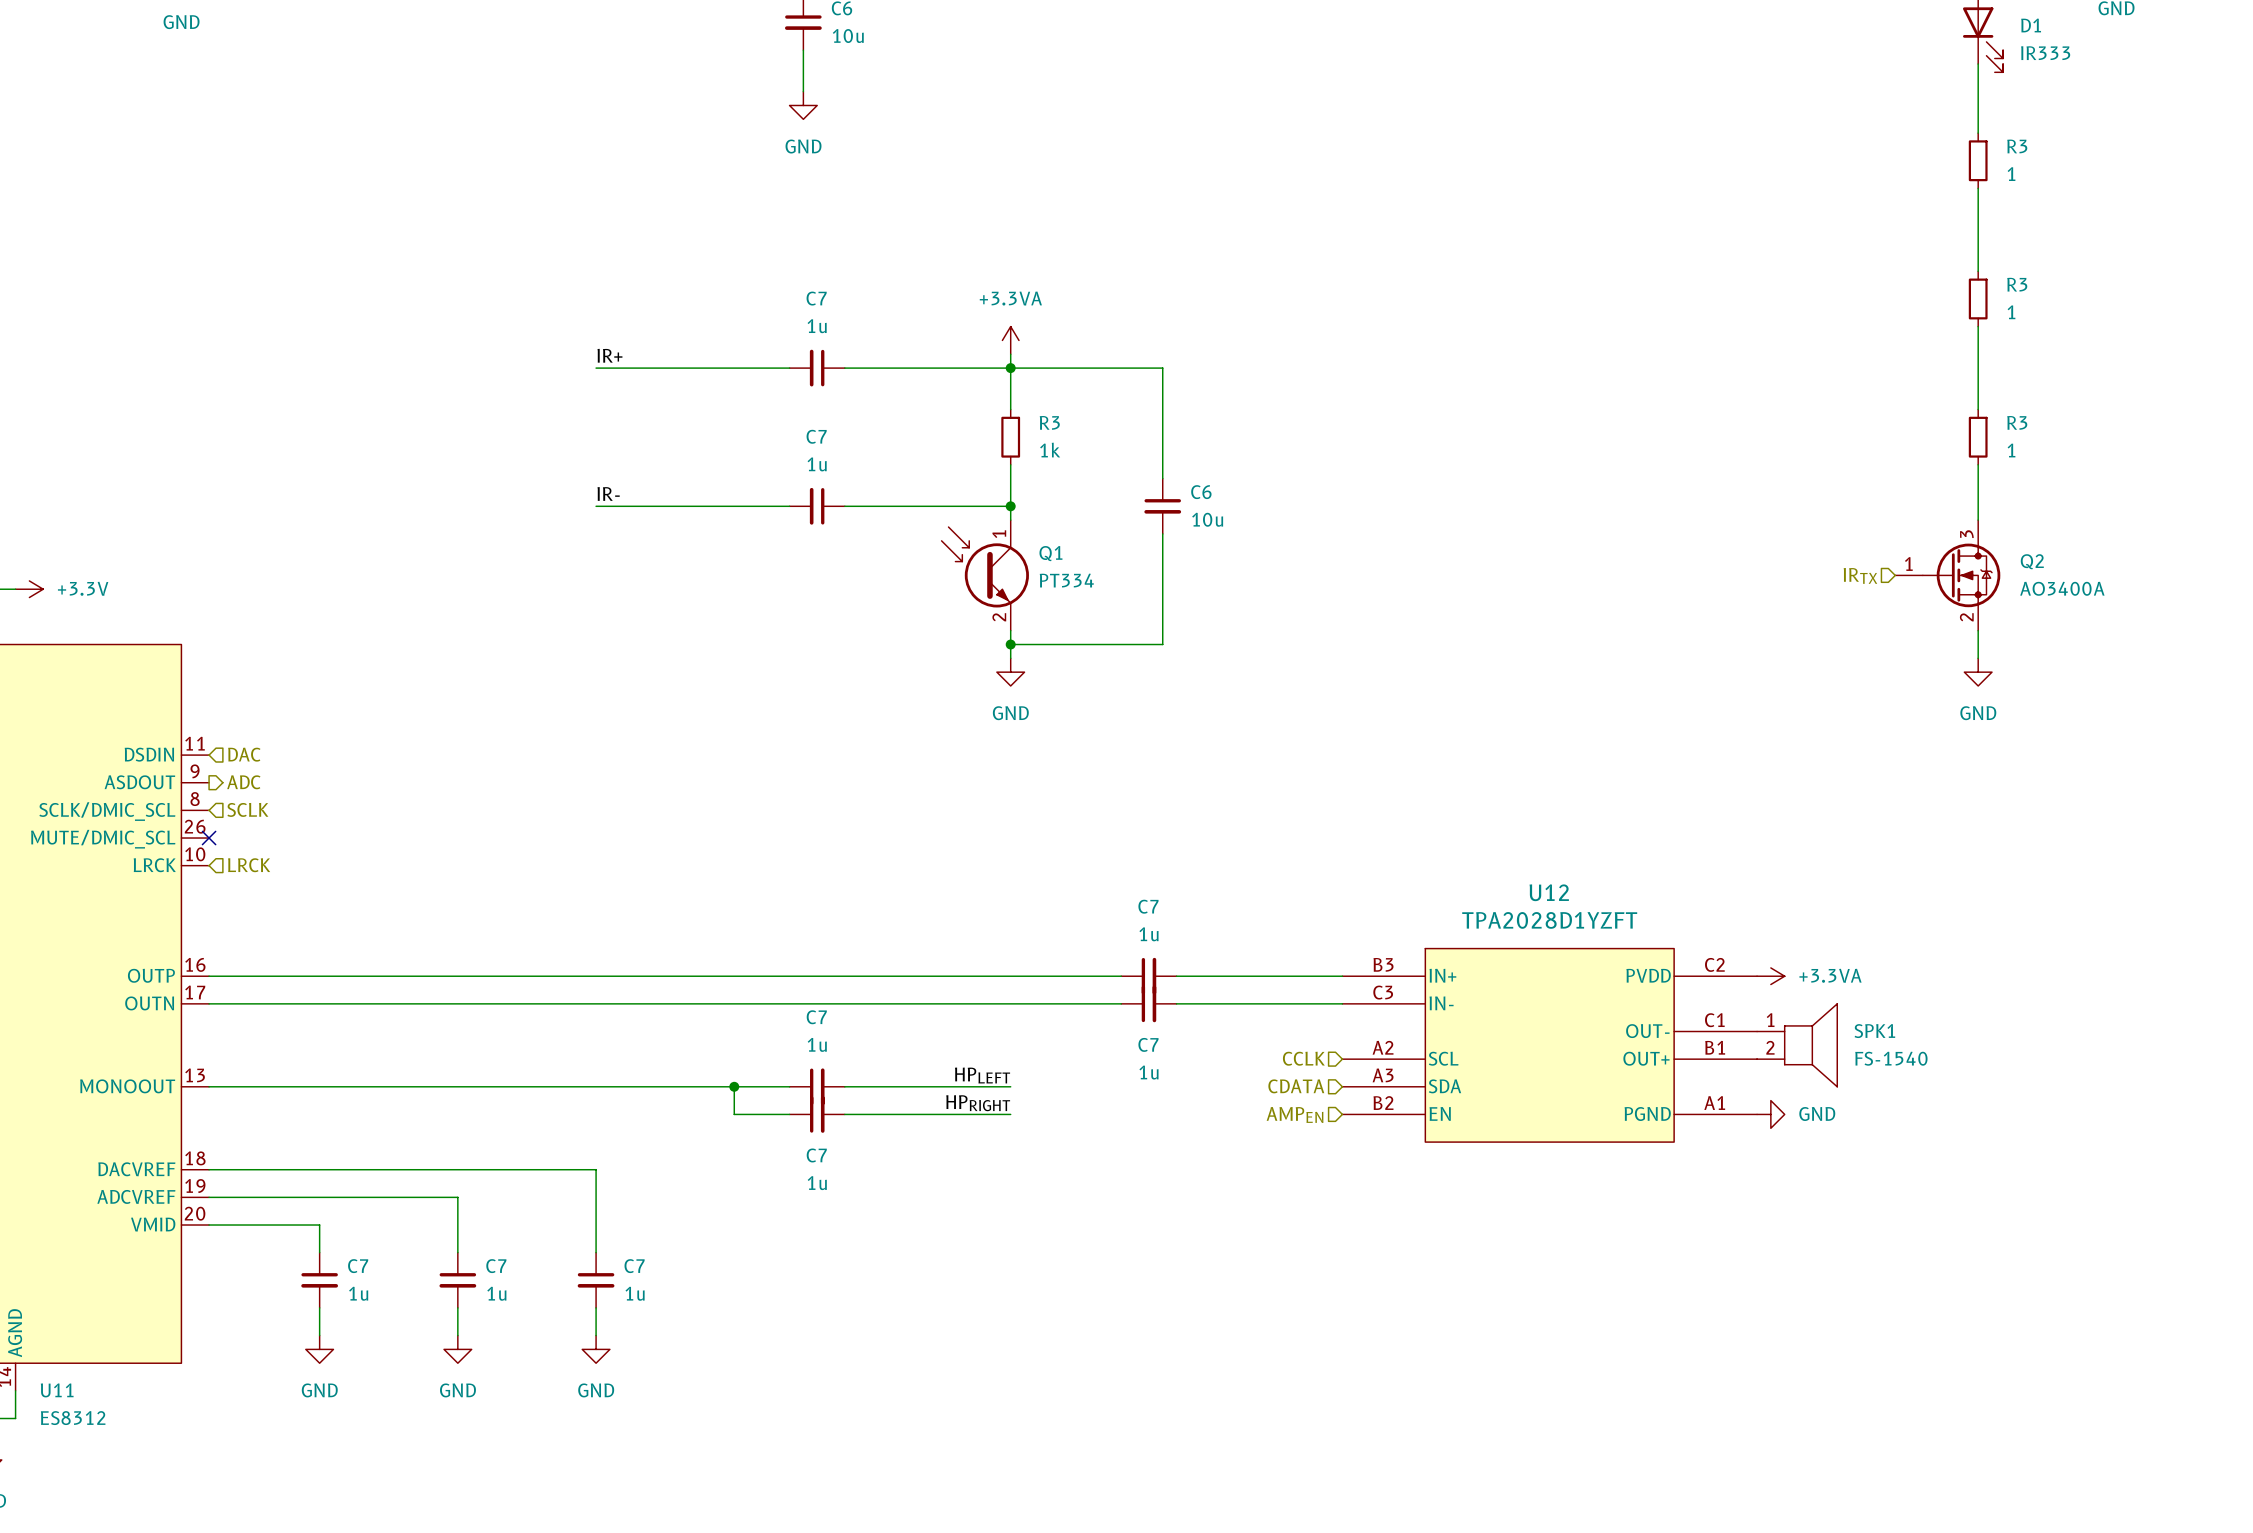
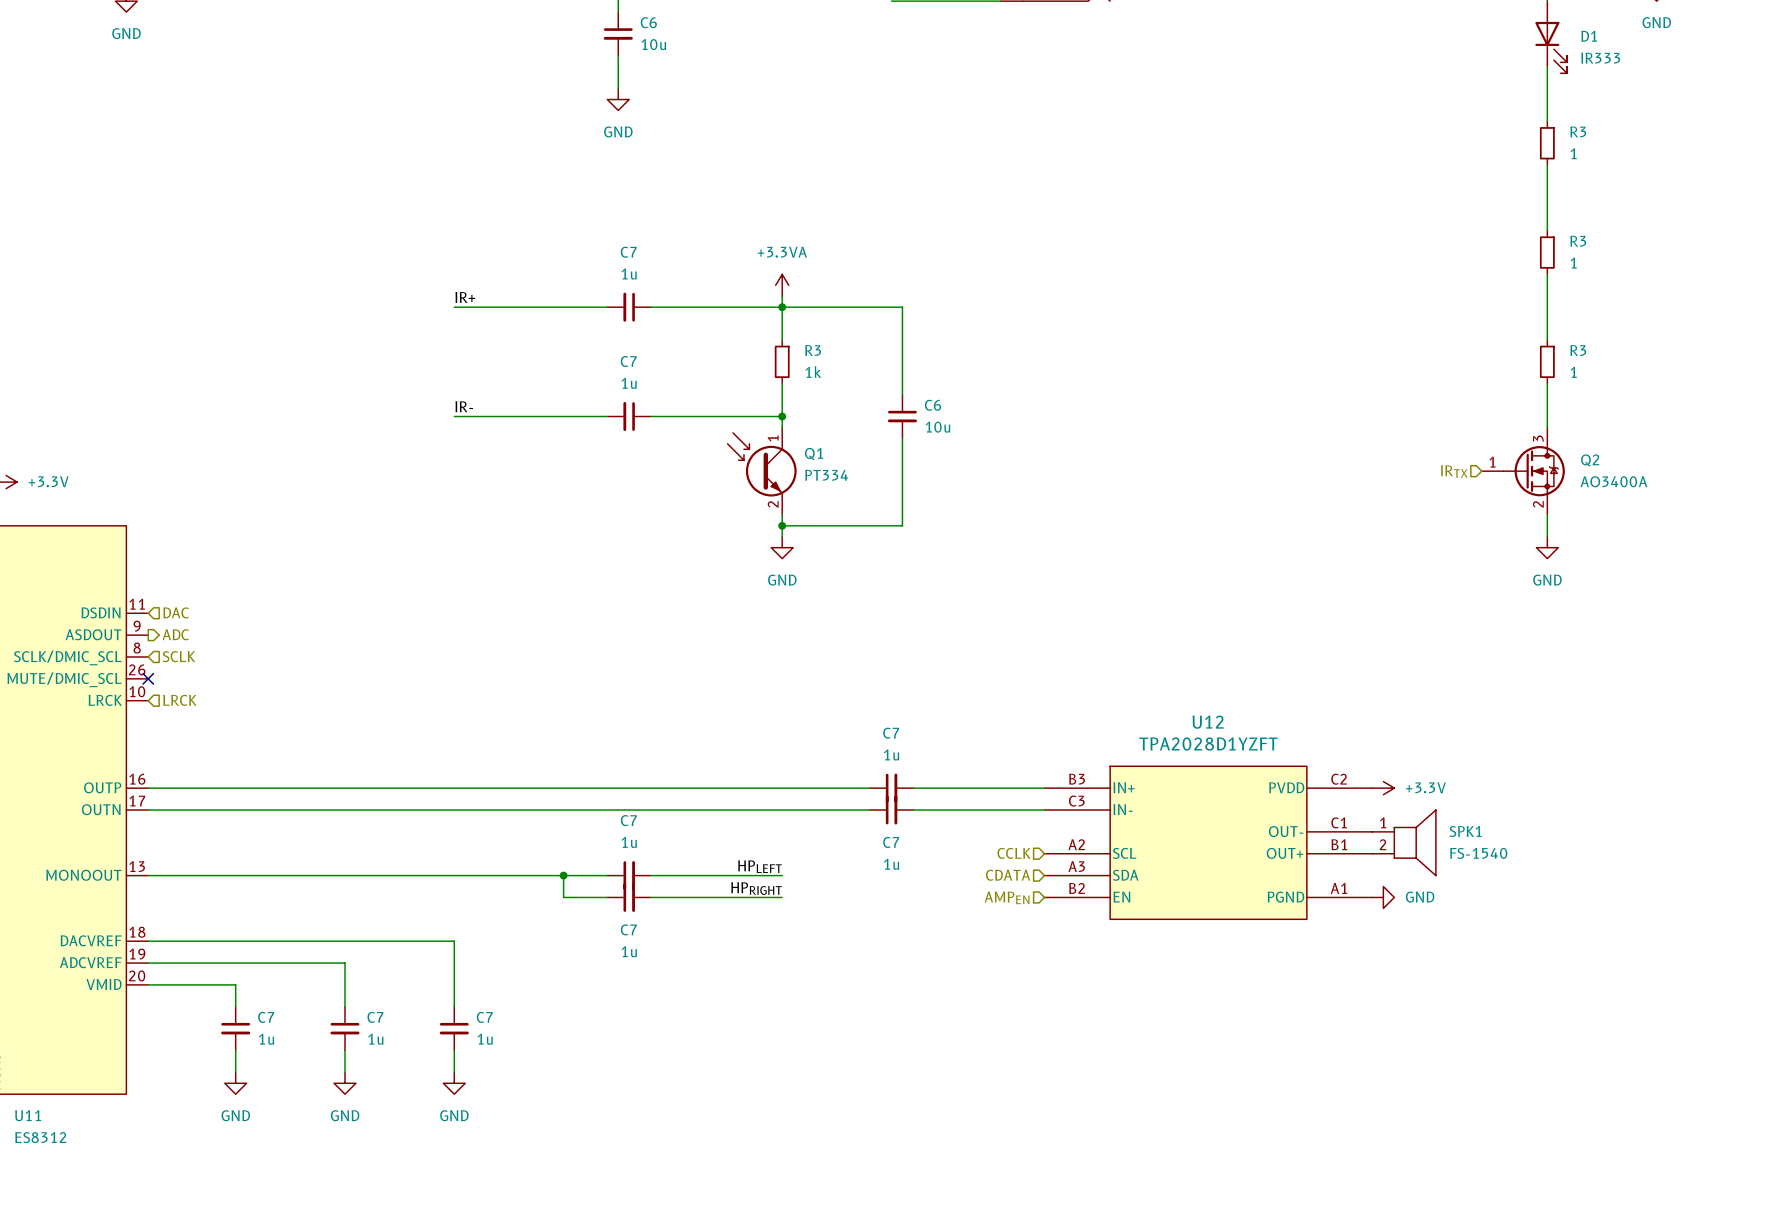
power symbol: +3.3VA (1770, 976) -> +3.3V (1383, 788)

